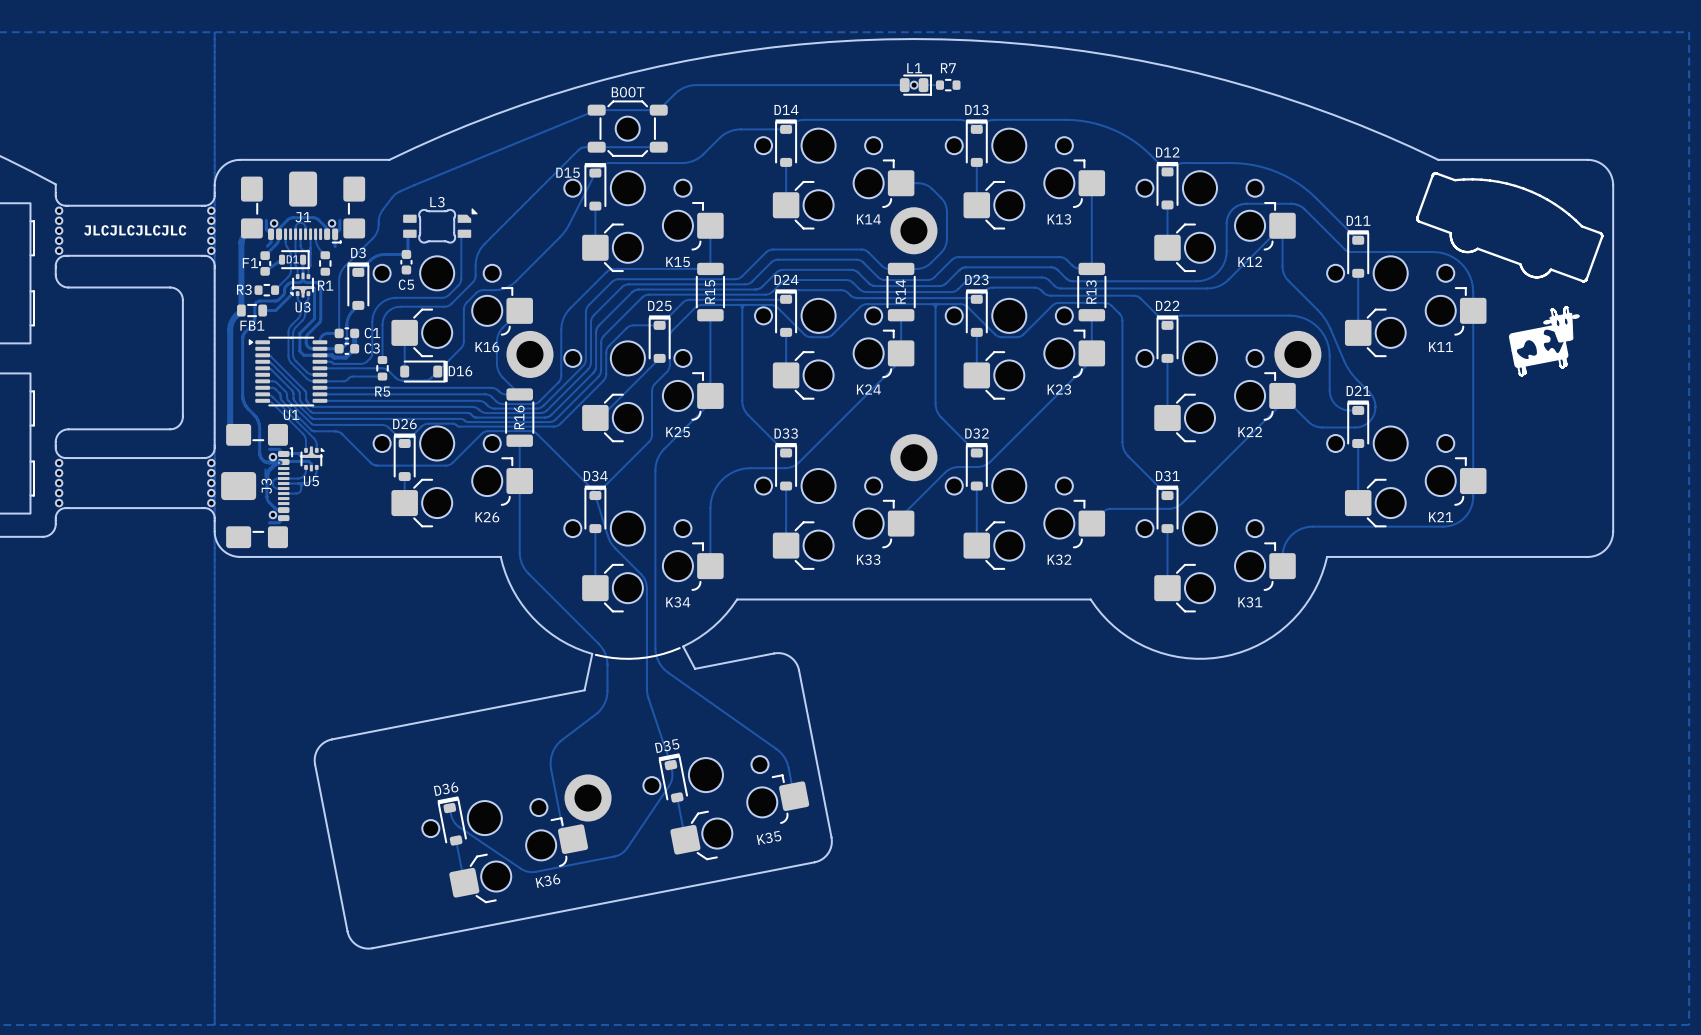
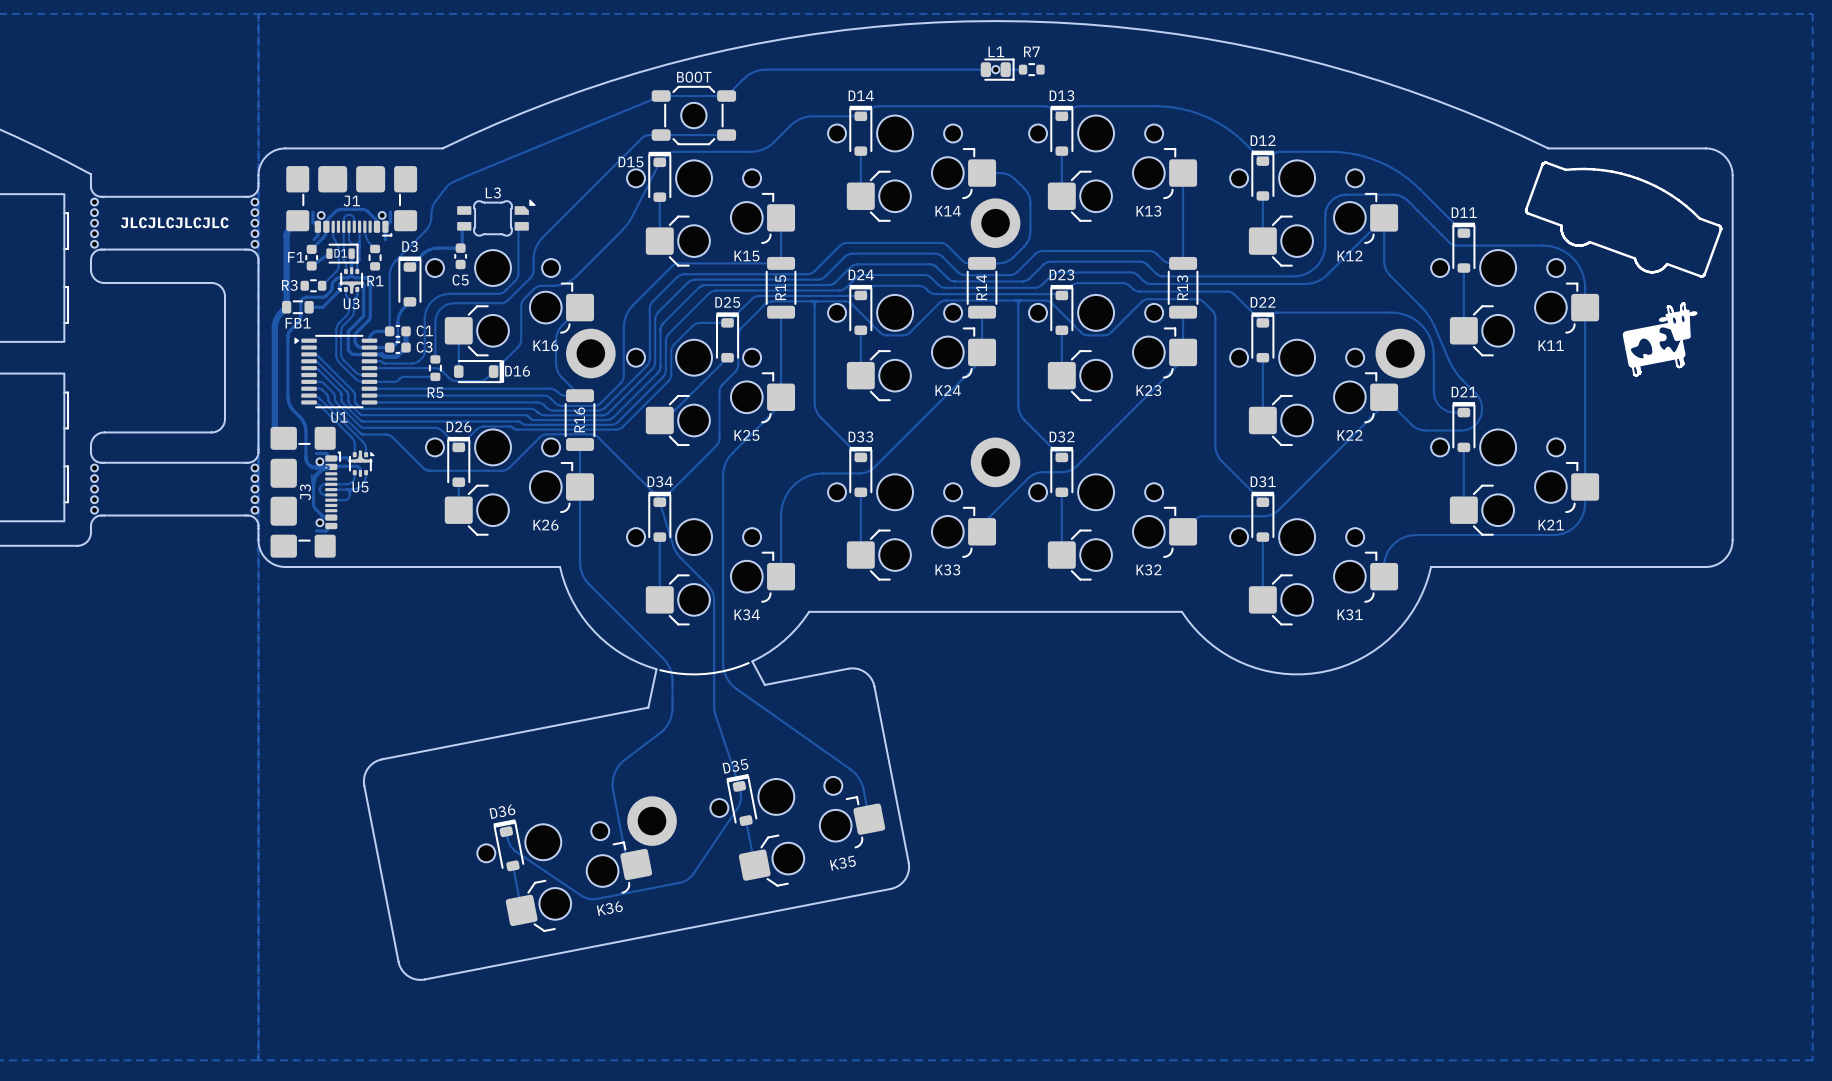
J1 footprint: [241, 171, 366, 244] -> [286, 166, 418, 237]
J3 footprint: [221, 423, 293, 549] -> [270, 426, 341, 558]

